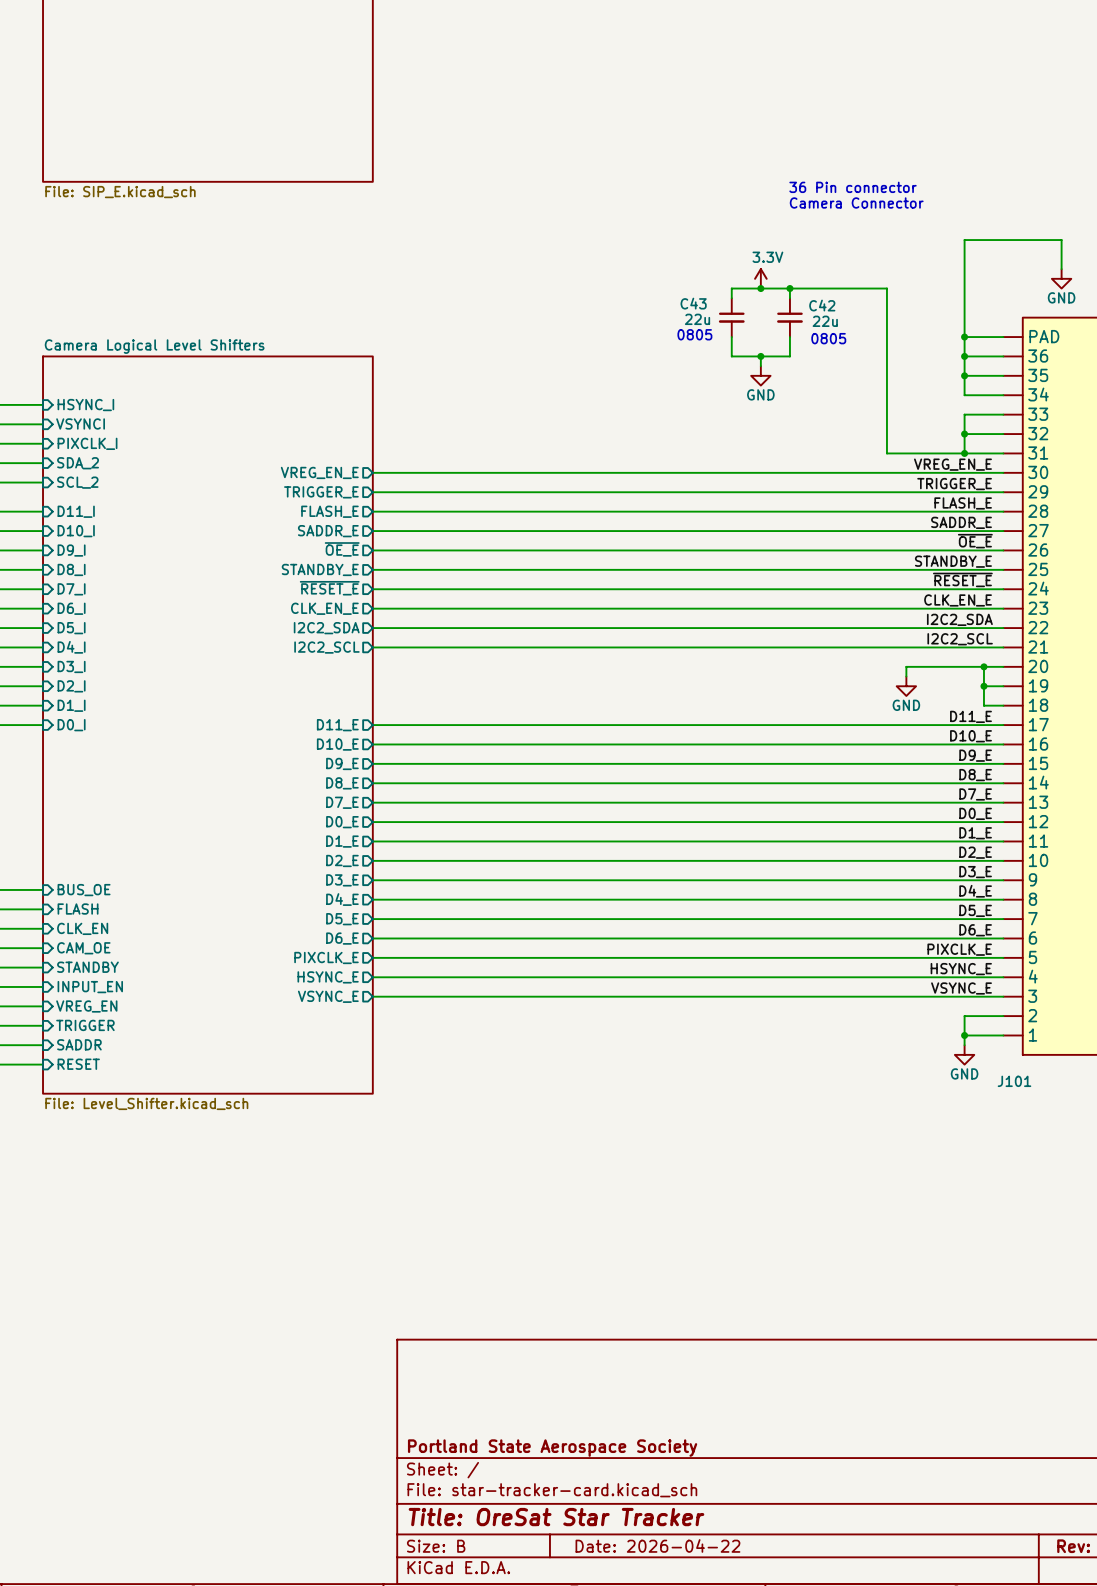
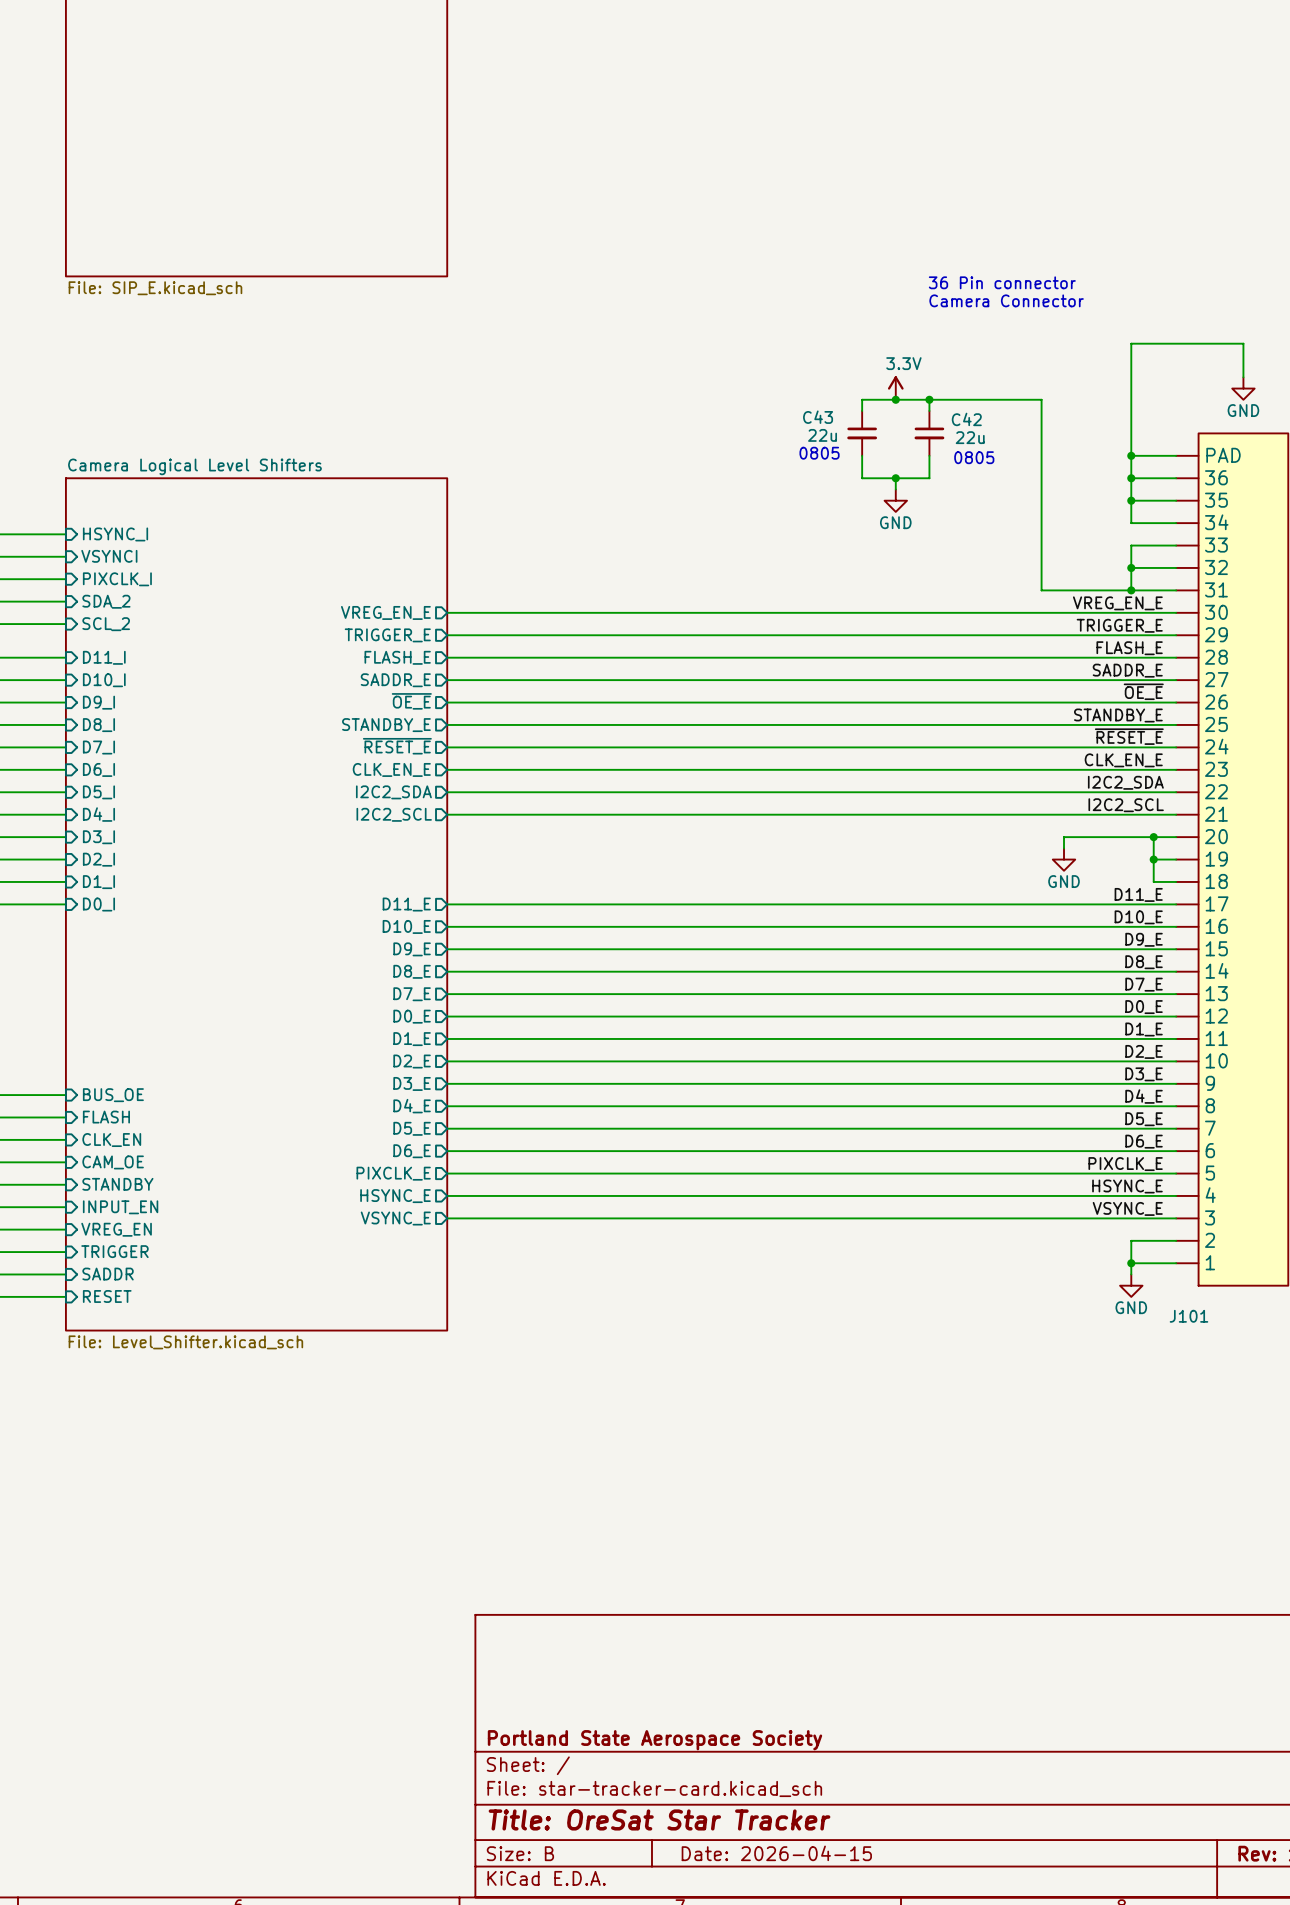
title block: Date: 2026-04-22 (657, 1545) -> Date: 2026-04-15 (776, 1853)

